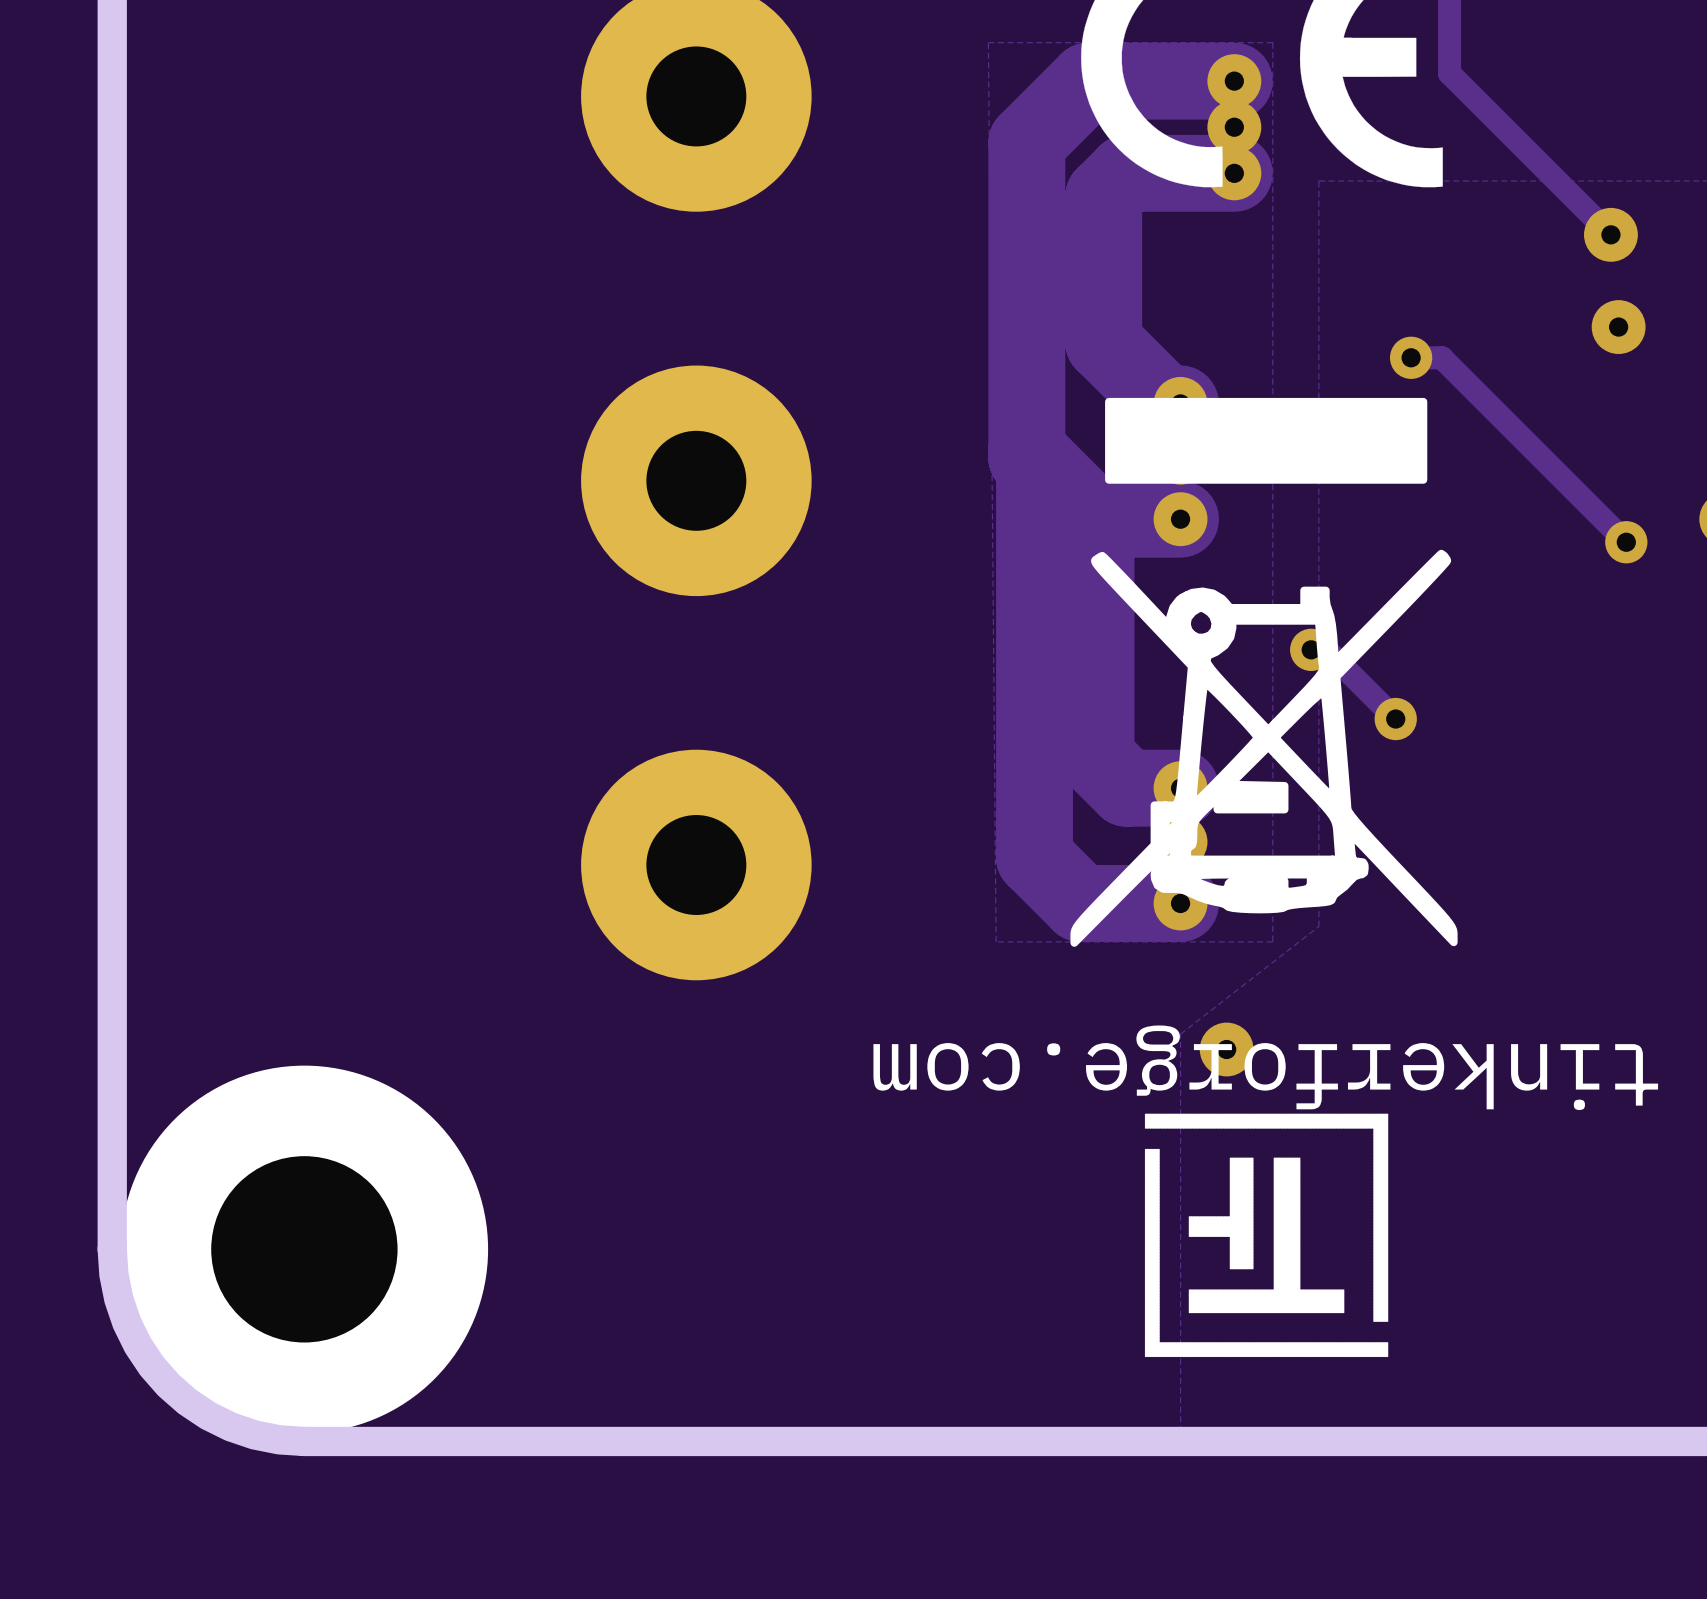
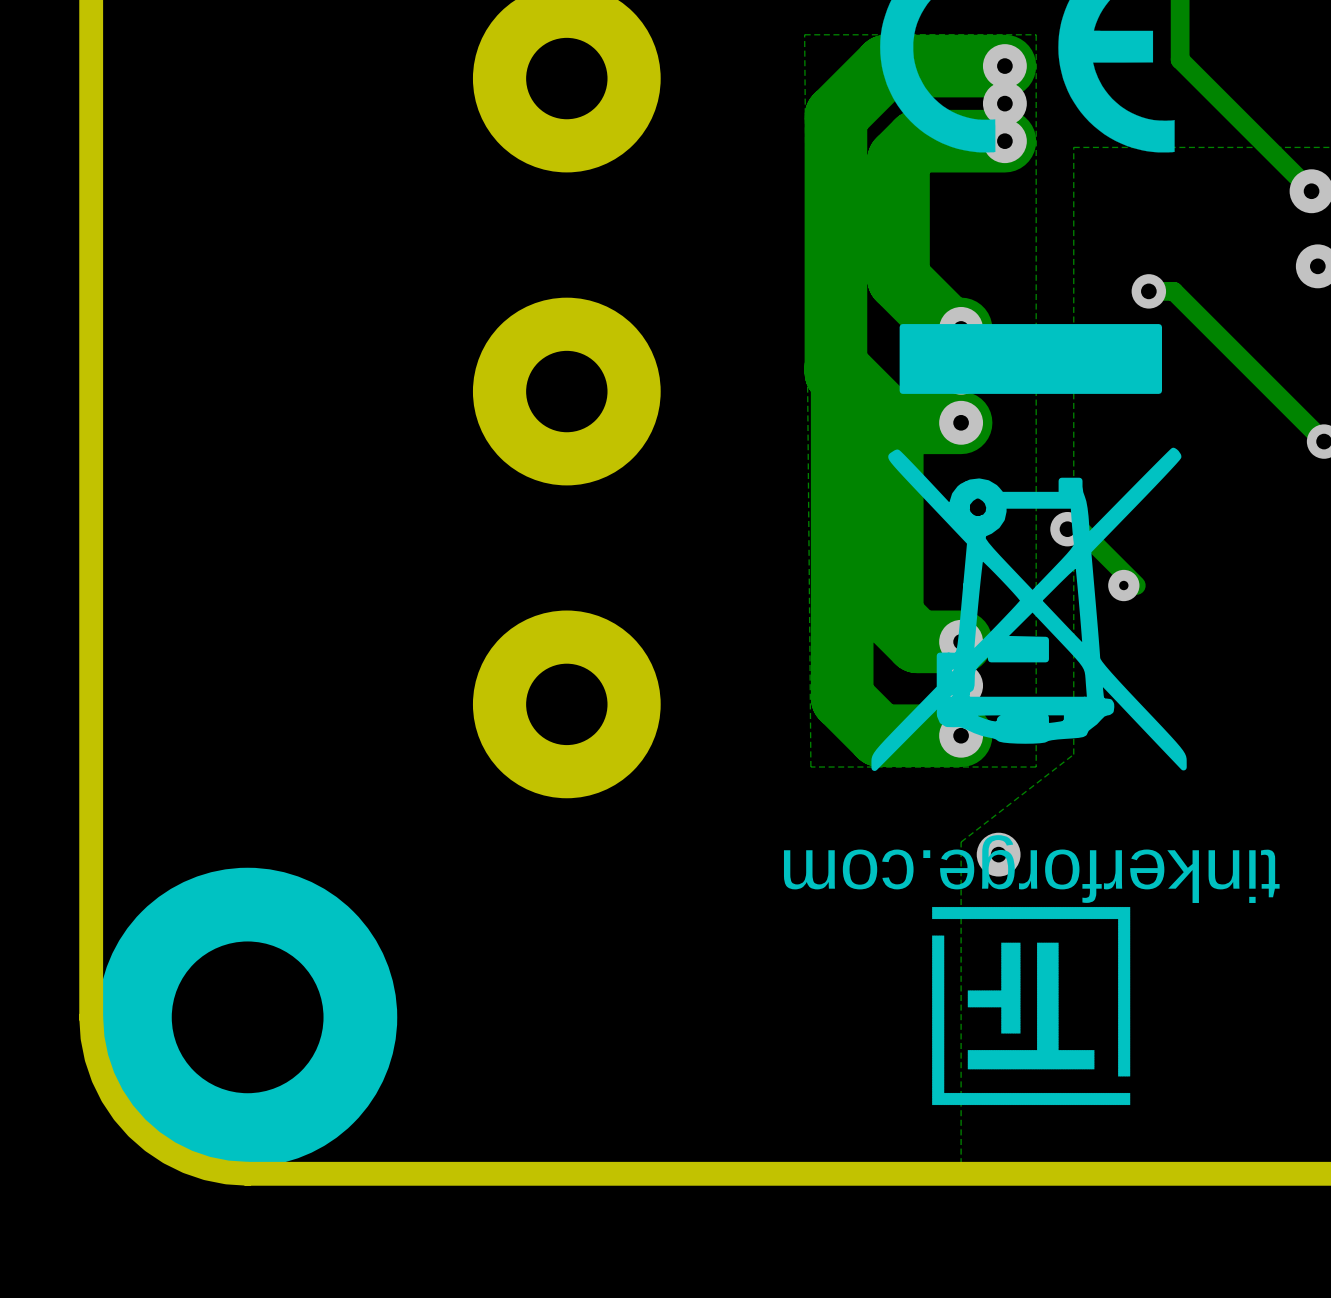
via position: (1395, 719) -> (1123, 585)

